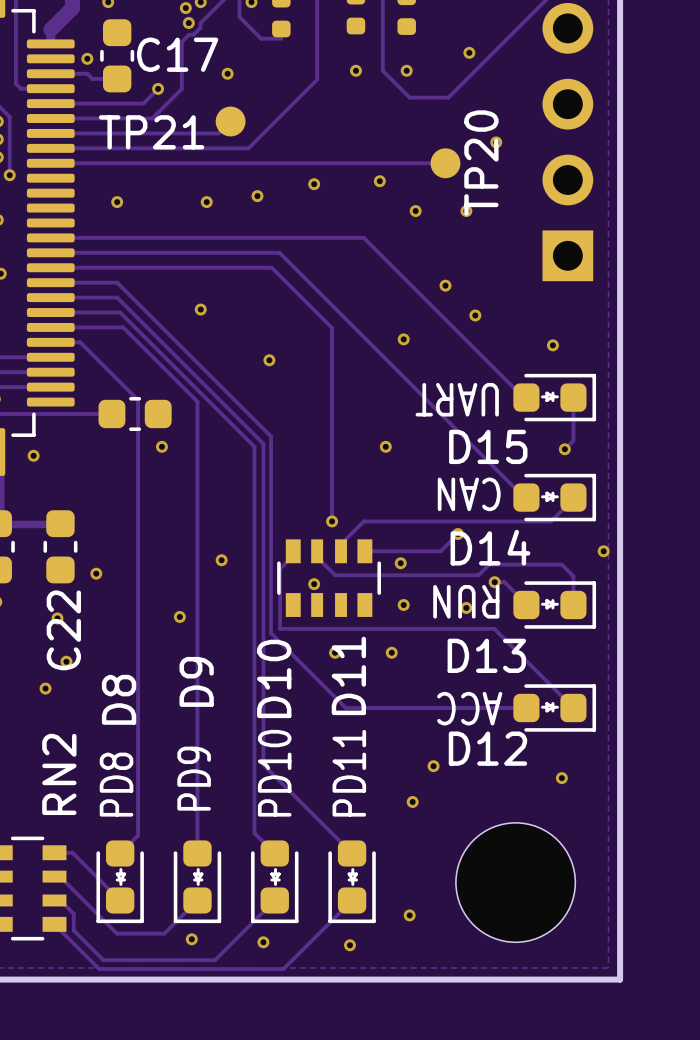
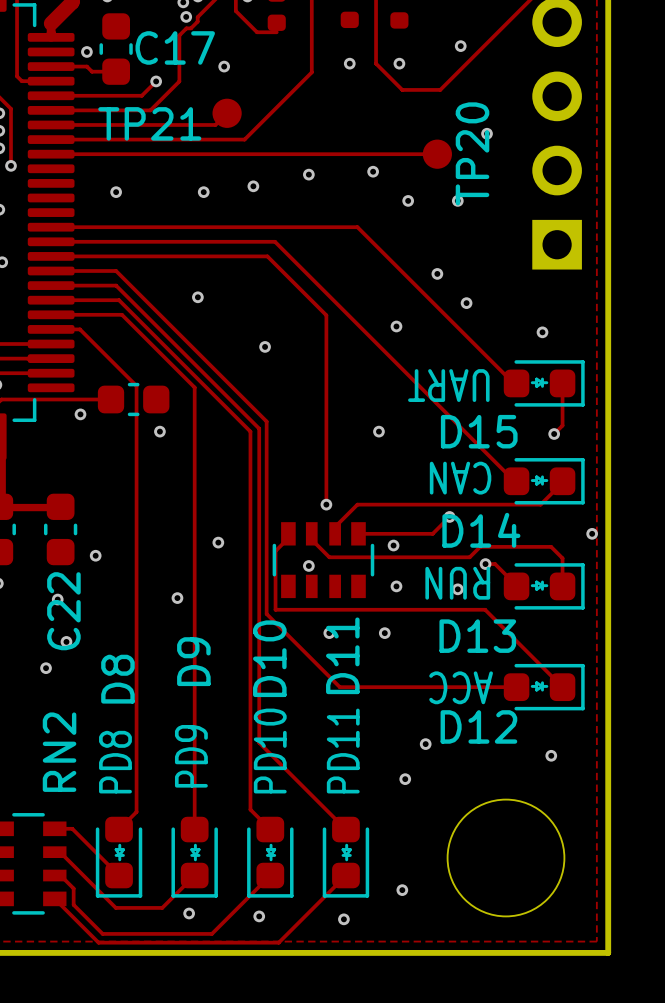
via position: (33, 455) -> (80, 414)

